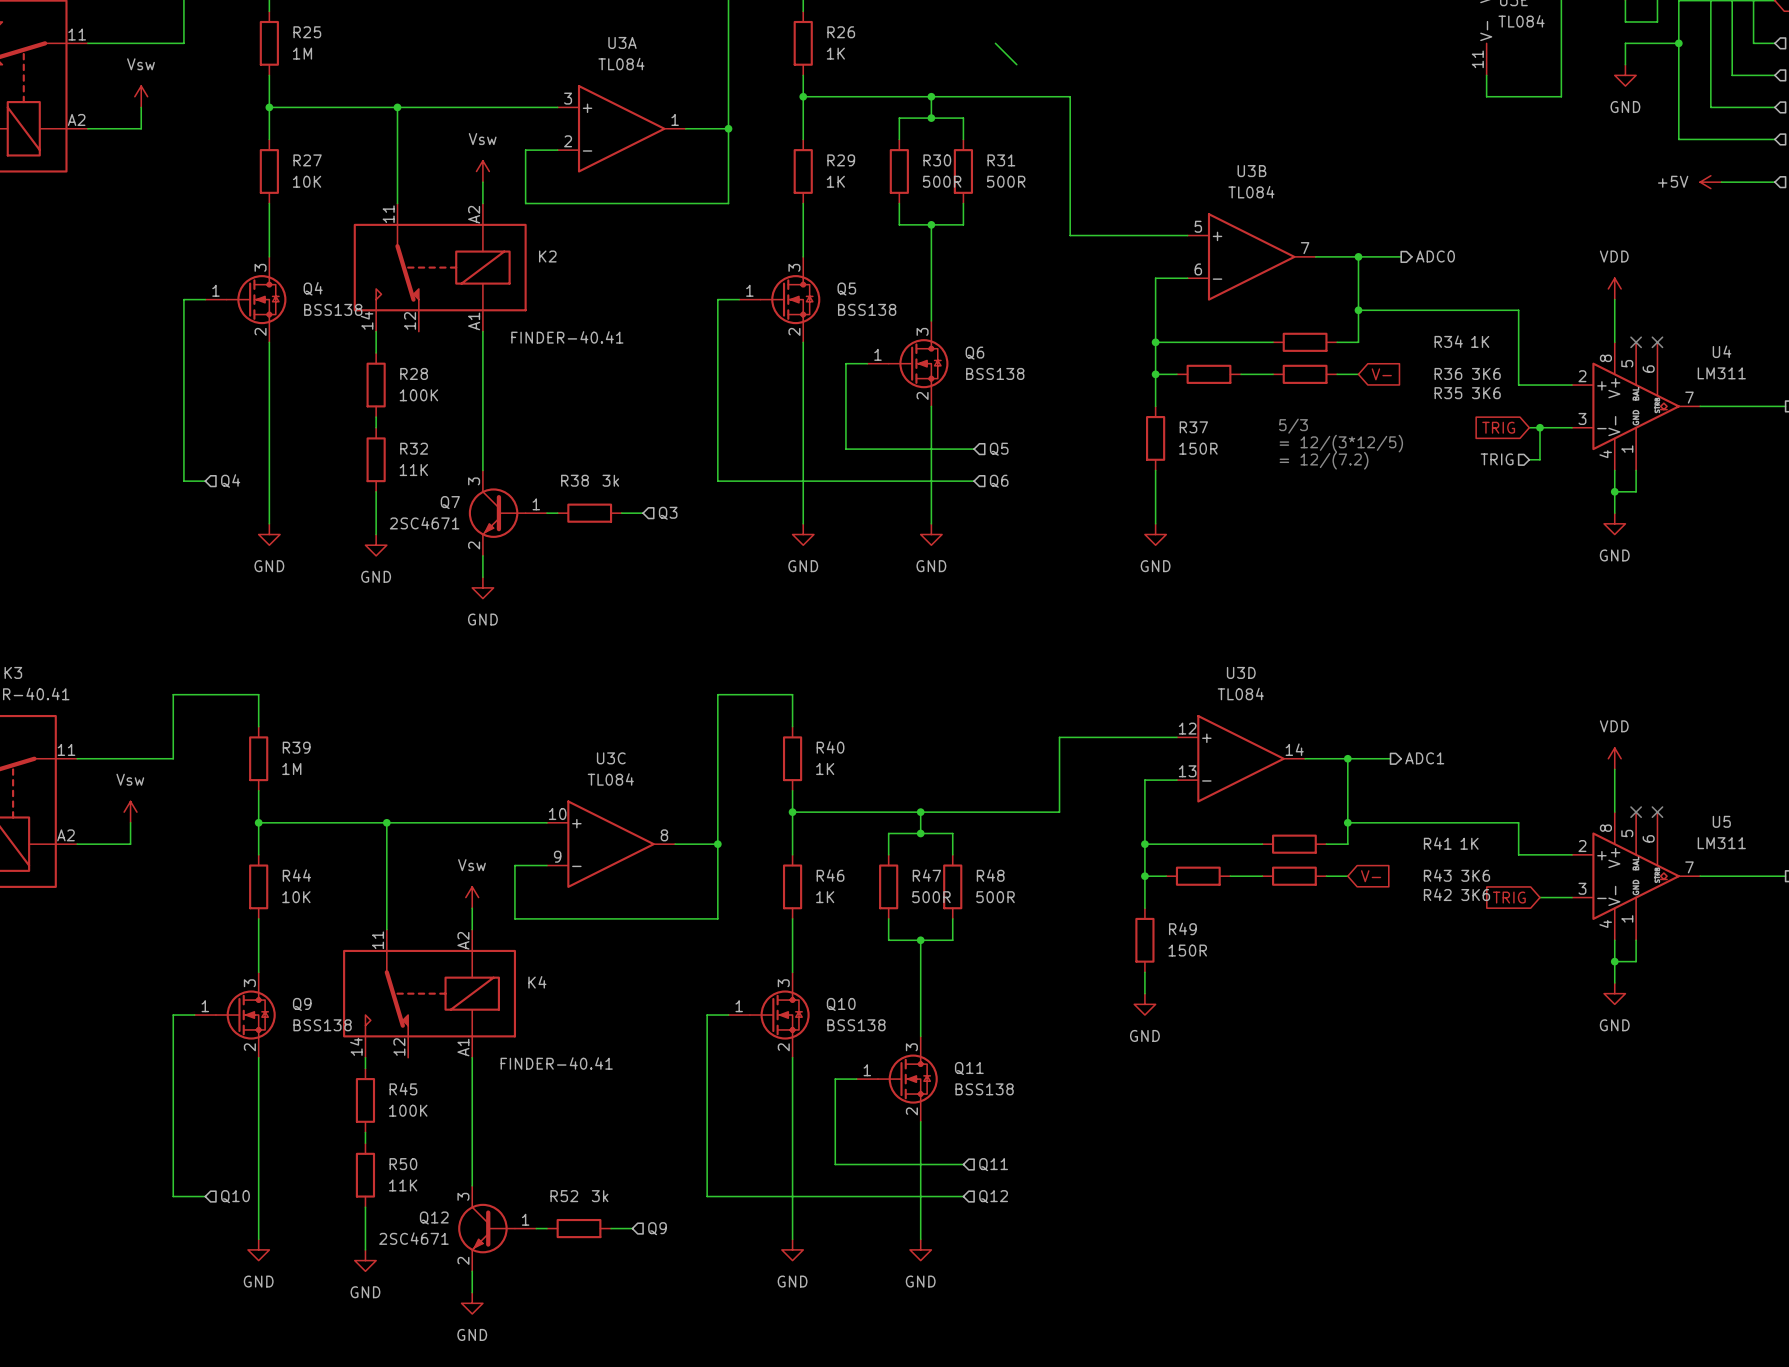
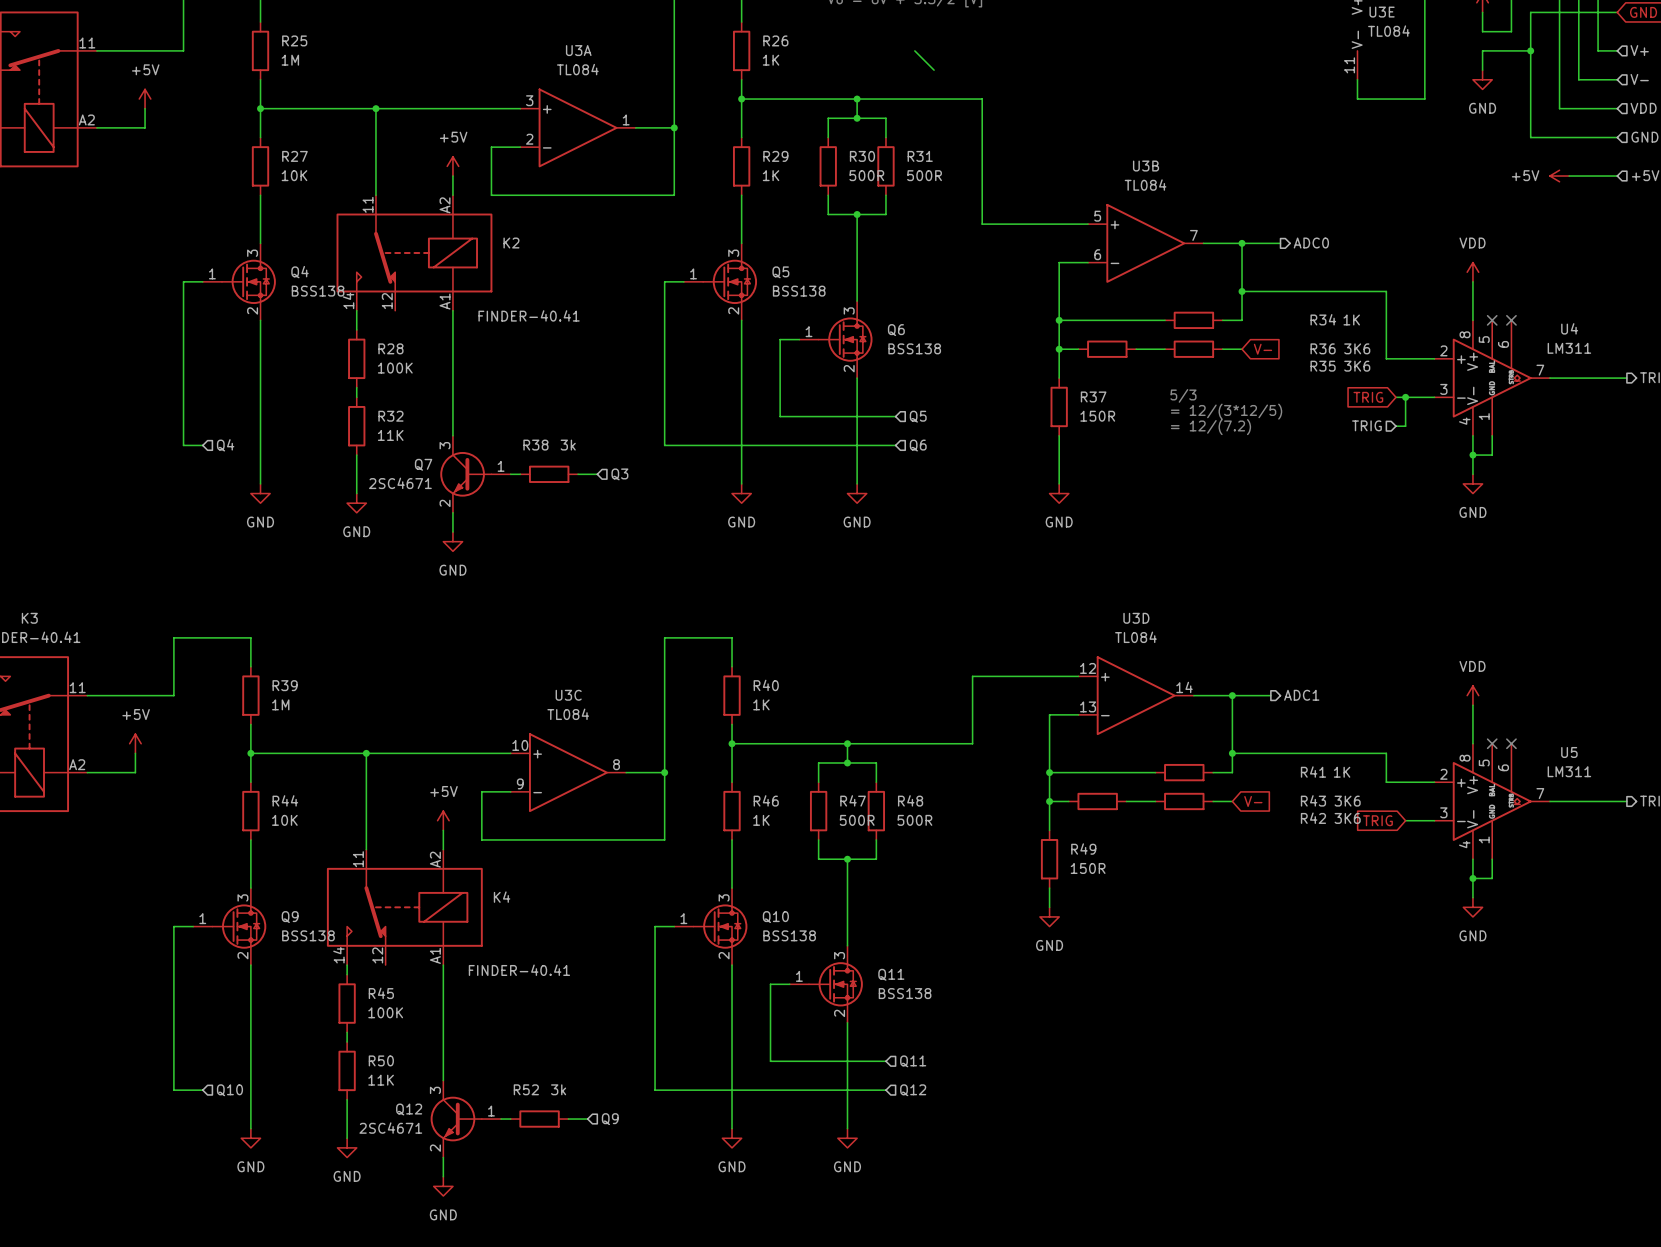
power symbol: Vsw (141, 96) -> +5V (145, 99)
power symbol: Vsw (482, 171) -> +5V (452, 166)
power symbol: Vsw (130, 812) -> +5V (135, 743)
power symbol: Vsw (472, 897) -> +5V (443, 820)

